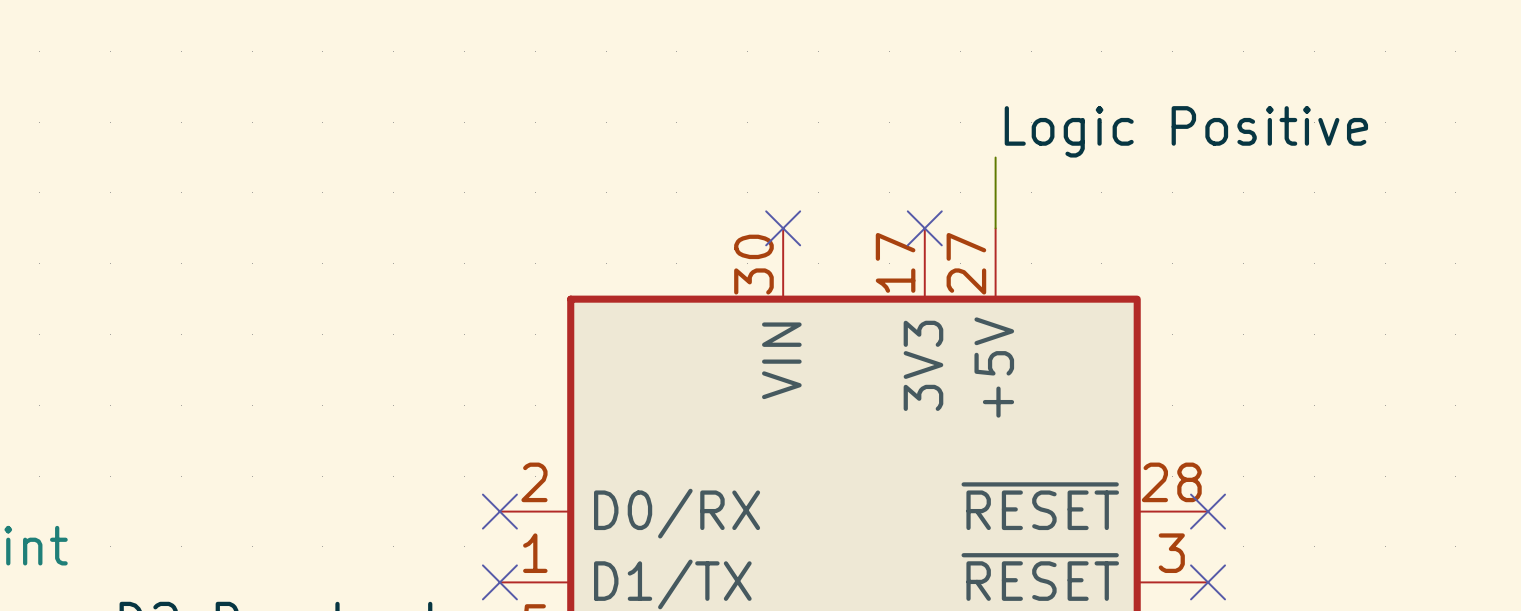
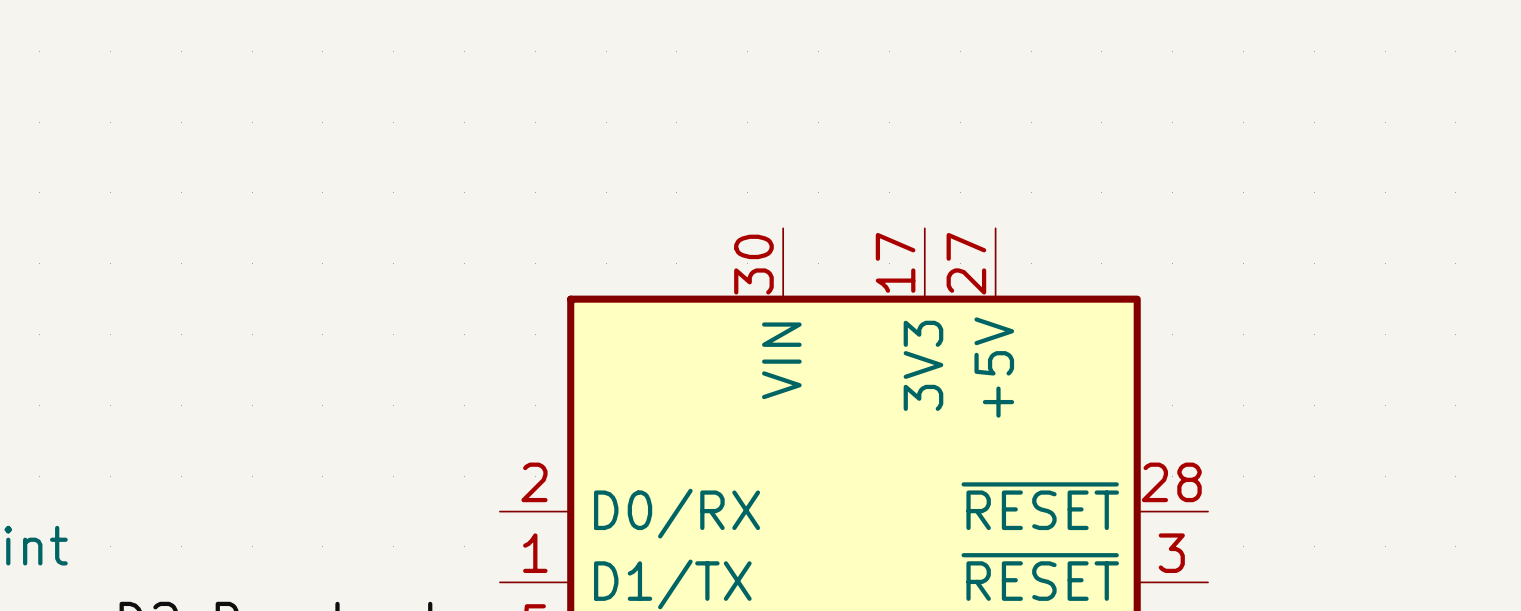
label: Logic Positive (1186, 131) -> none
wire: (995, 157) (995, 228) -> none
no-connect mark: (783, 228) -> none
no-connect mark: (924, 228) -> none
no-connect mark: (499, 511) -> none
no-connect mark: (1208, 511) -> none
no-connect mark: (499, 582) -> none
no-connect mark: (1208, 582) -> none

